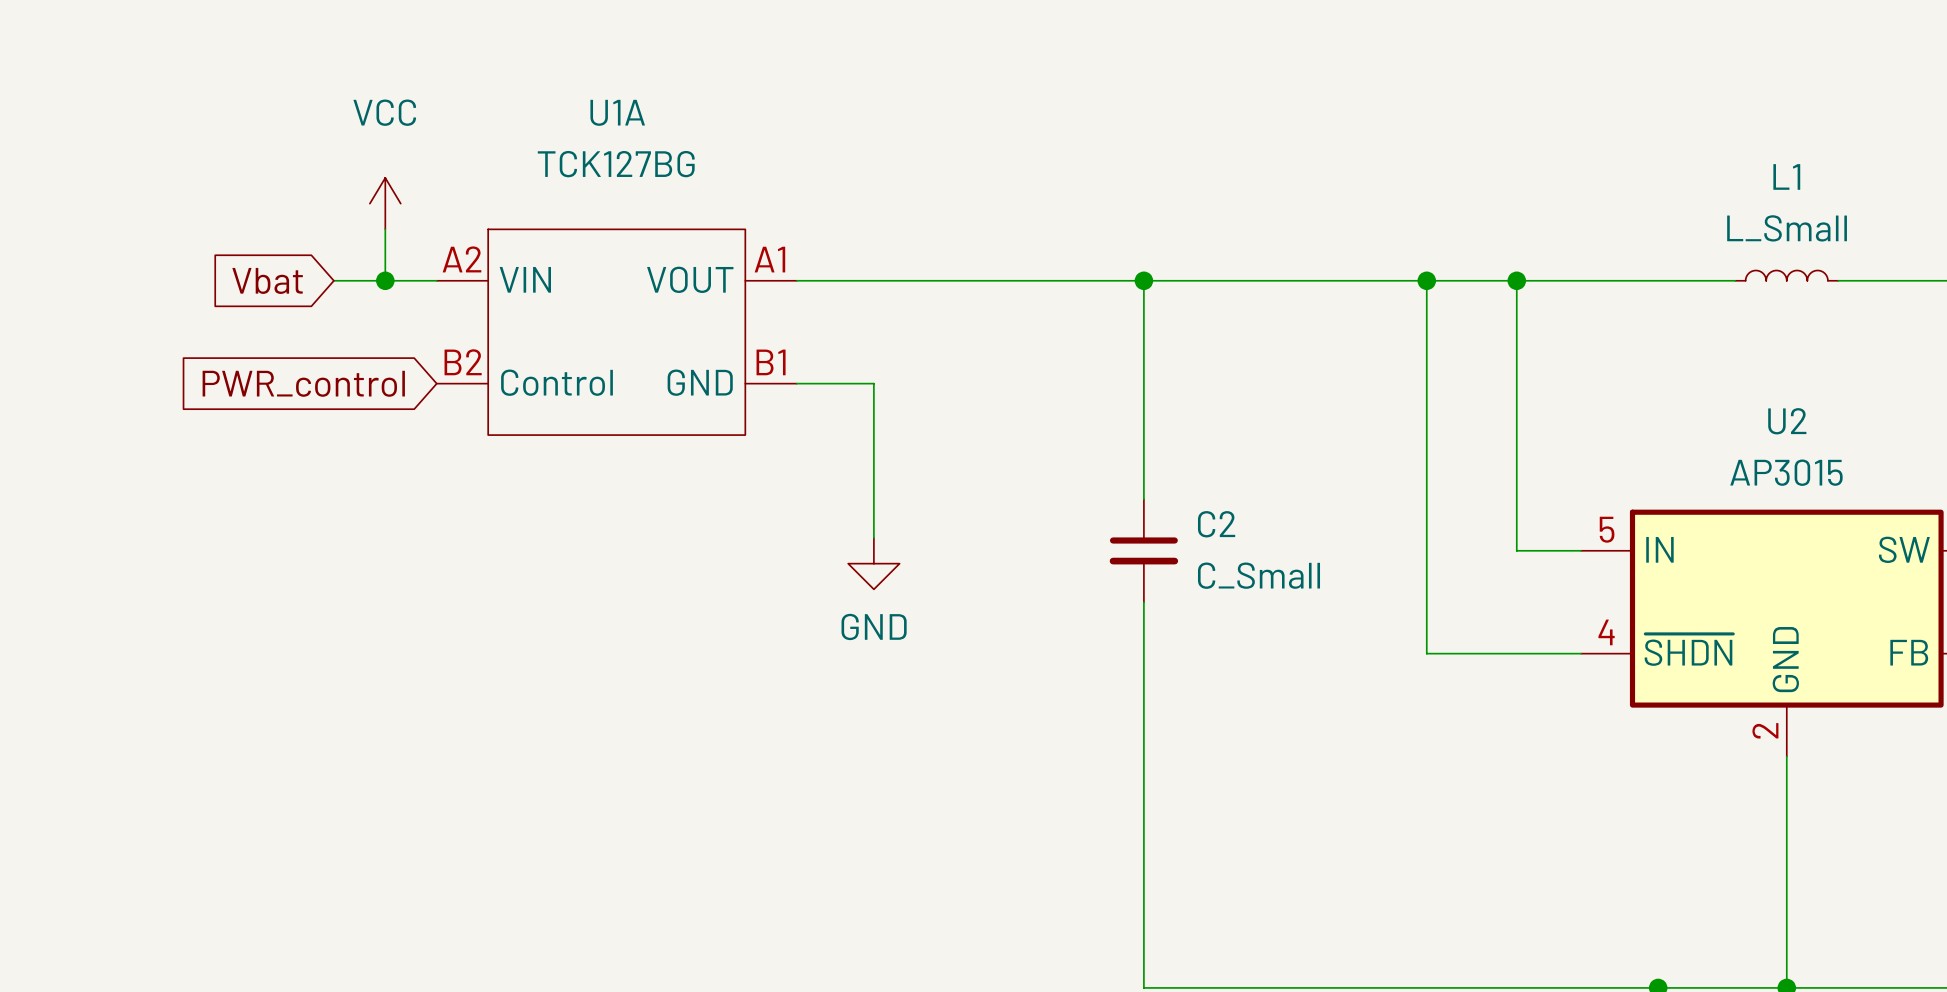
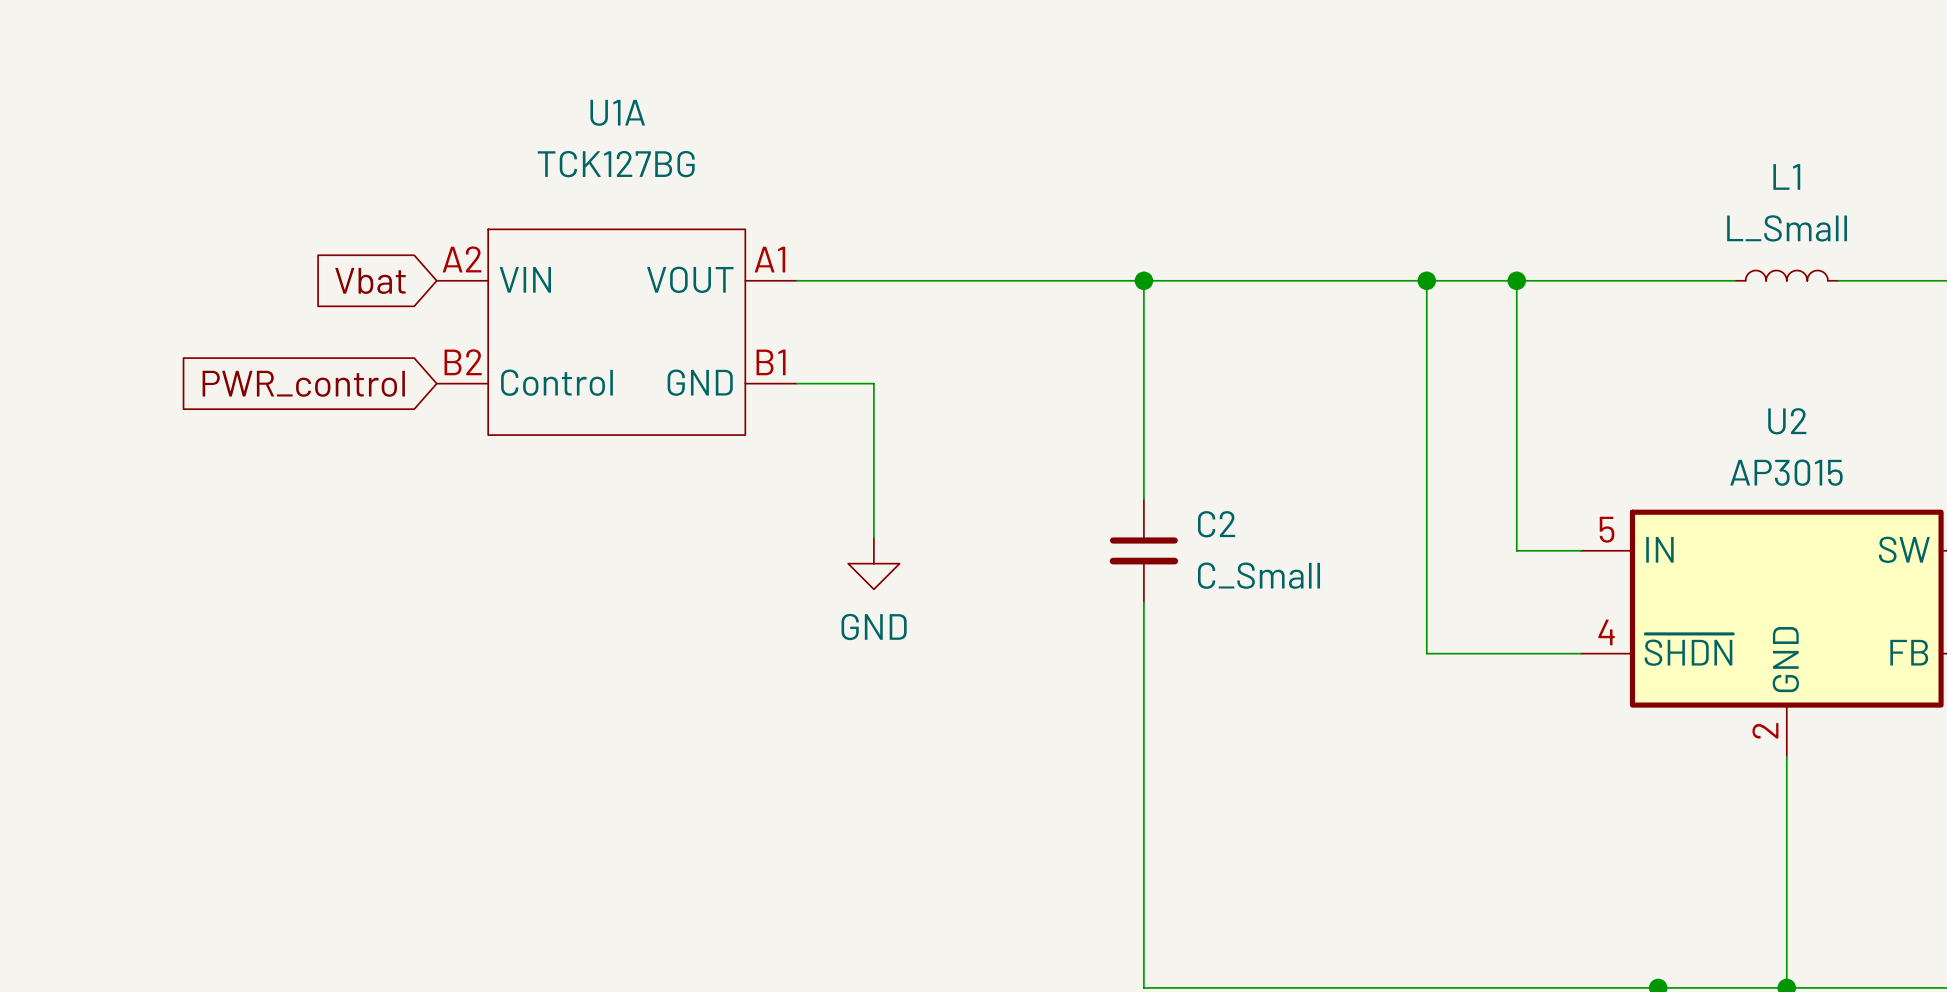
power symbol: VCC (385, 203) -> none
wire: (385, 229) (385, 280) -> none
global label position: Vbat (267, 280) -> Vbat (370, 280)
wire: (333, 280) (436, 280) -> none
junction: (385, 280) -> none

